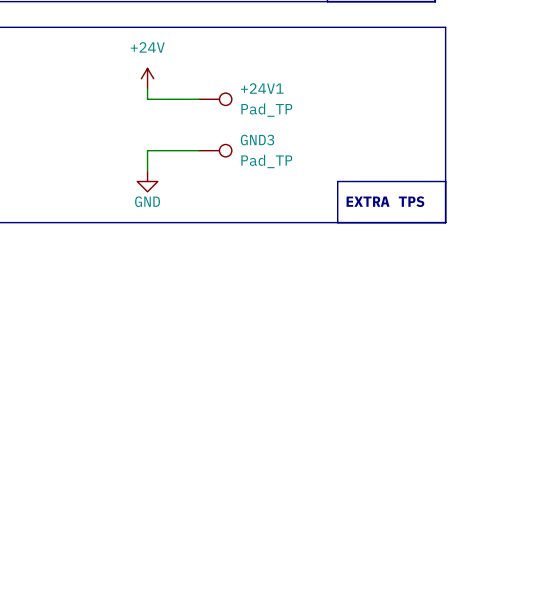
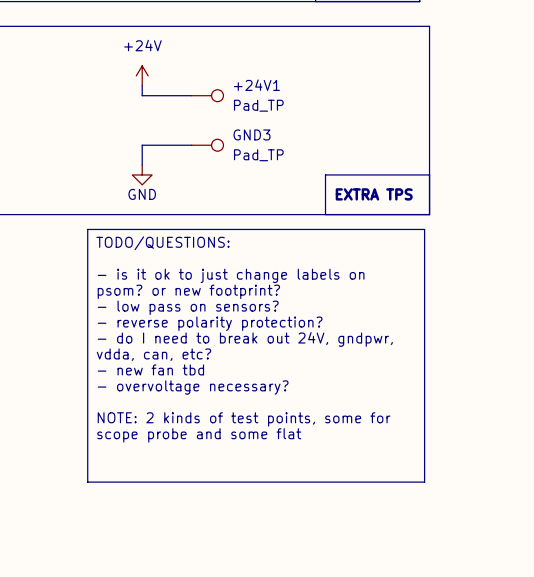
line: none -> (87, 229) (424, 229) (424, 482) (87, 482) (87, 229)
text: none -> TODO/QUESTIONS: (162, 243)
text: none -> - is it ok to just change labels on (231, 275)
text: none -> psom? or new footprint? (188, 291)
text: none -> - low pass on sensors? (188, 307)
text: none -> - reverse polarity protection? (210, 323)
text: none -> - do I need to break out 24V, gndpwr, (245, 339)
text: none -> vdda, can, etc? (153, 354)
text: none -> - new fan tbd (150, 369)
text: none -> - overvoltage necessary? (193, 387)
text: none -> NOTE: 2 kinds of test points, some for (244, 419)
text: none -> scope probe and some flat (199, 435)

